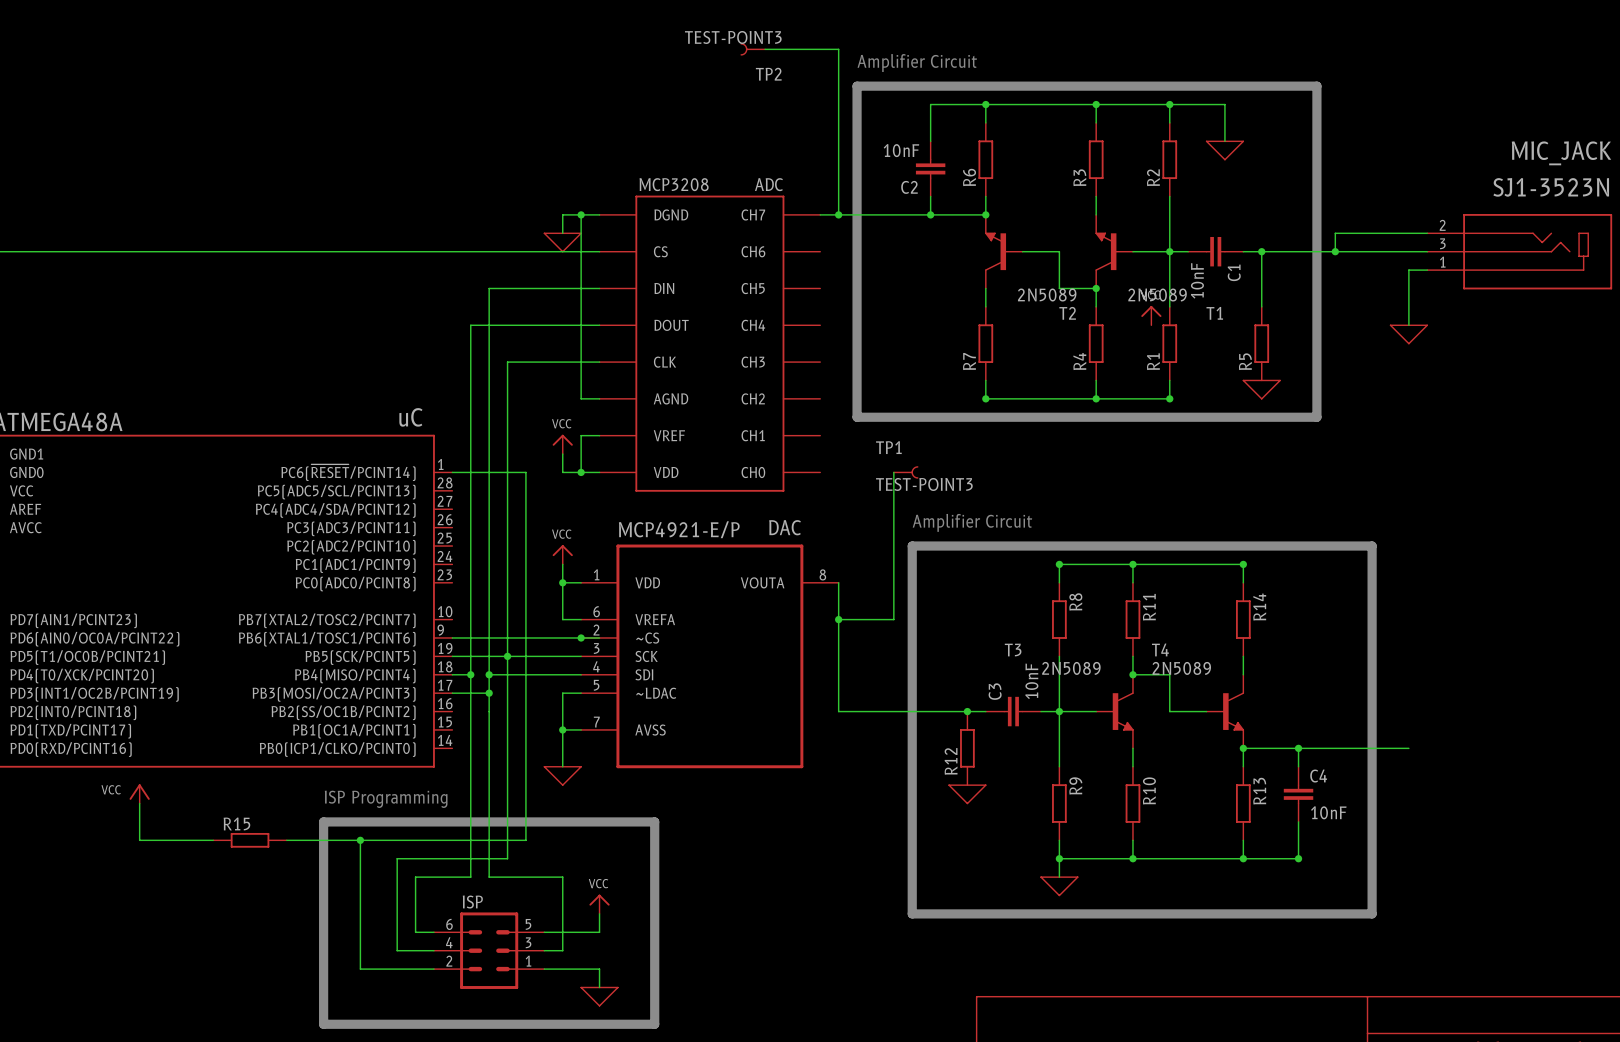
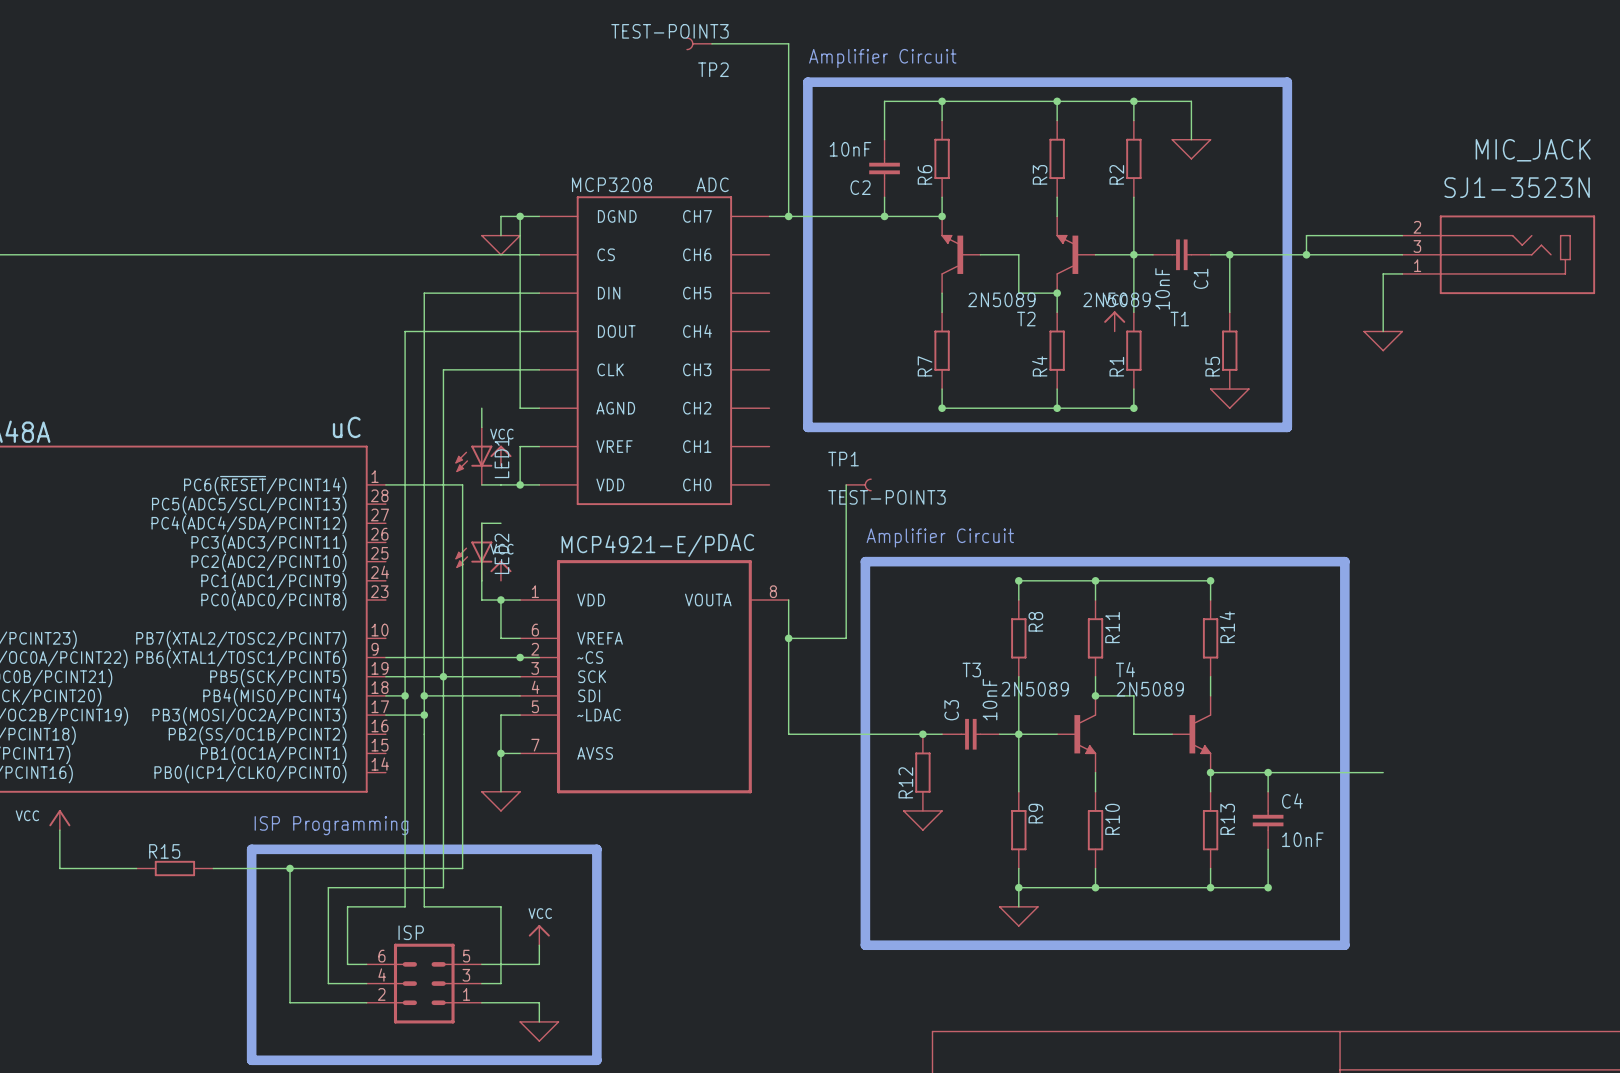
wire: none -> (481, 408) (481, 427)
LED1: none -> (473, 456)
wire: (562, 454) (562, 472) -> (481, 484) (500, 484)
LED2: none -> (473, 552)
wire: (562, 564) (562, 582) -> (500, 523) (481, 523) (481, 600) (500, 600)

